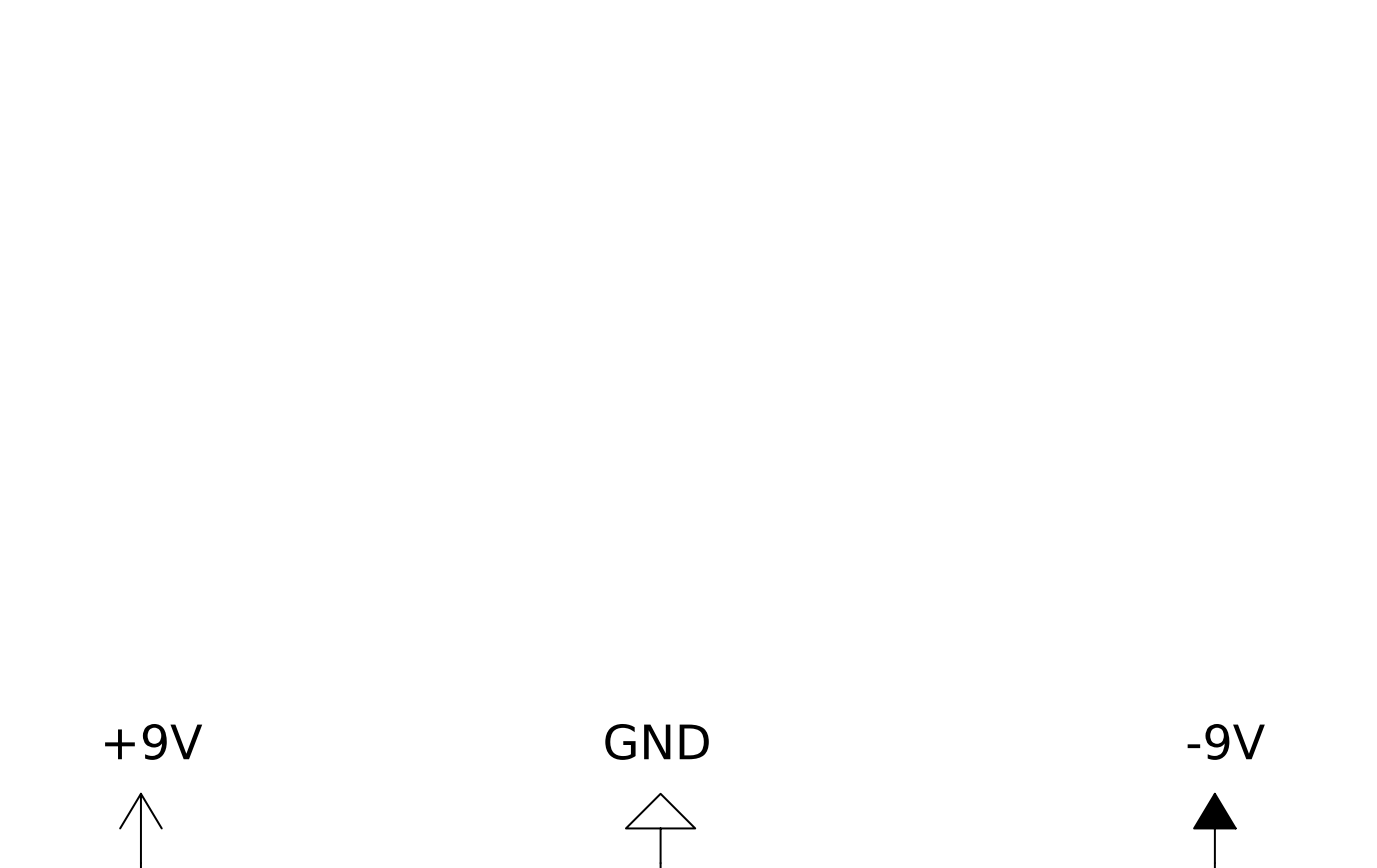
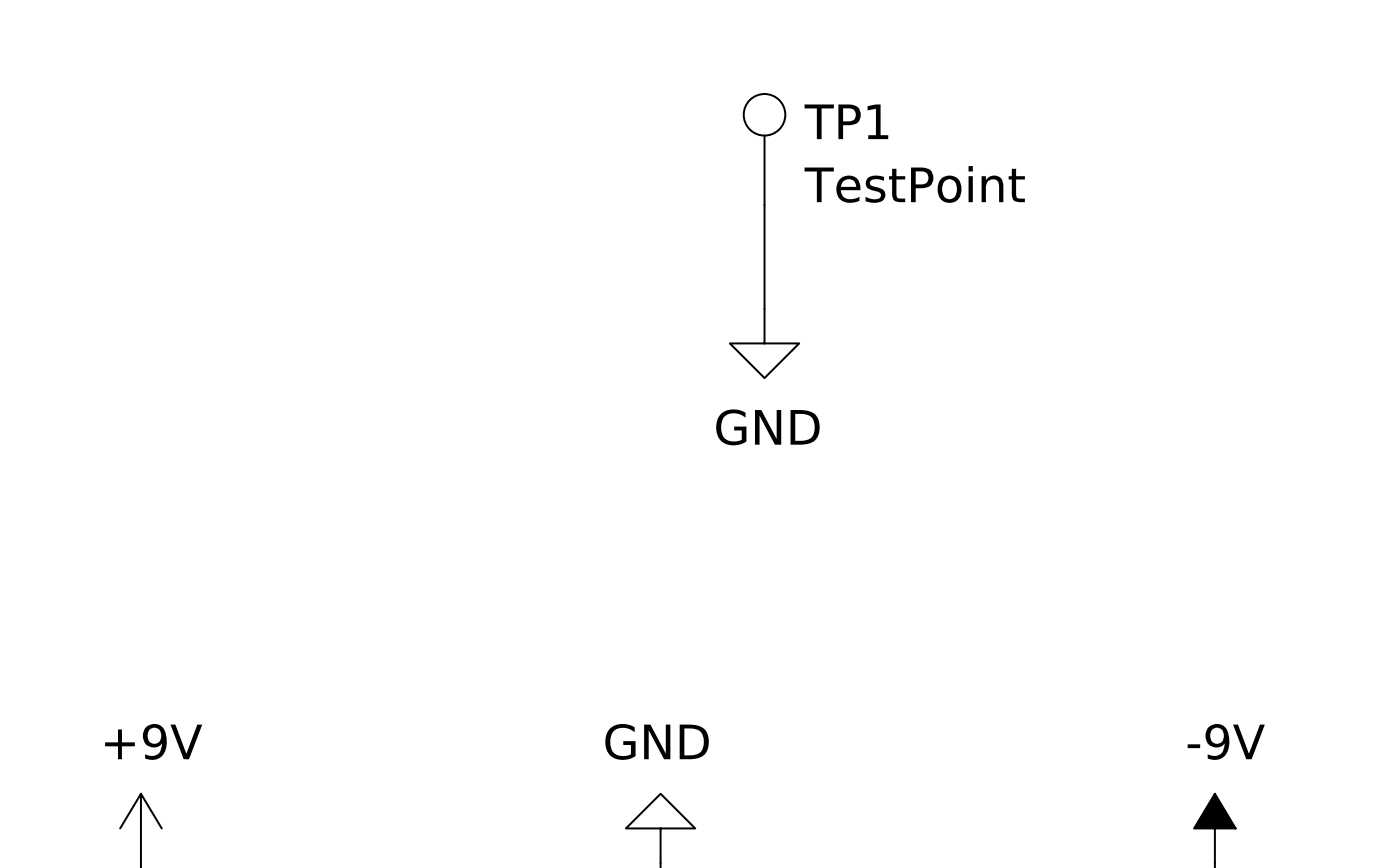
TP1: none -> TestPoint (764, 149)
wire: none -> (764, 204) (764, 308)
power symbol: none -> GND (764, 343)

